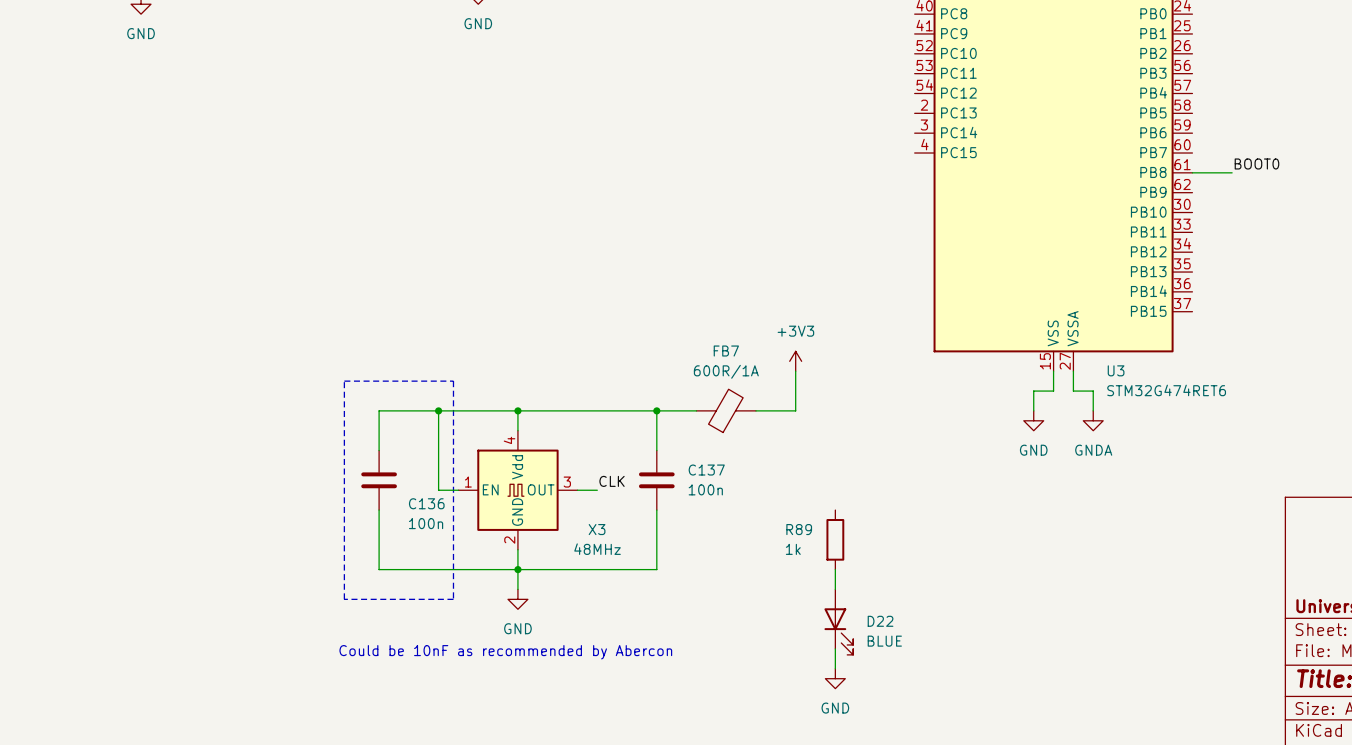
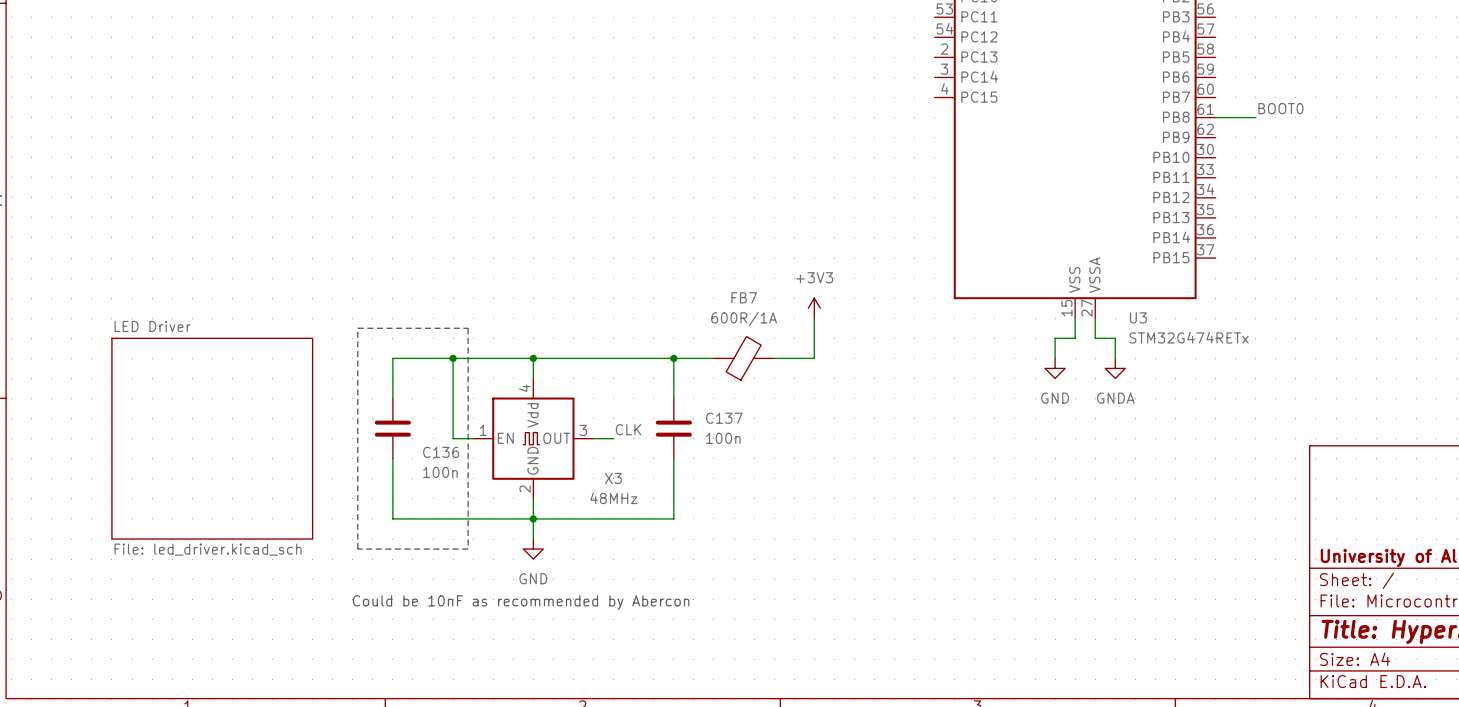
U3 value: STM32G474RET6 (1166, 390) -> STM32G474RETx (1189, 337)
sheet LED Driver: none -> File: led_driver.kicad_sch (212, 438)
R89: 1k (835, 539) -> none
wire: (835, 569) (835, 589) -> none
D22: BLUE (838, 622) -> none
wire: (835, 648) (835, 668) -> none
power symbol: GND (835, 678) -> none

